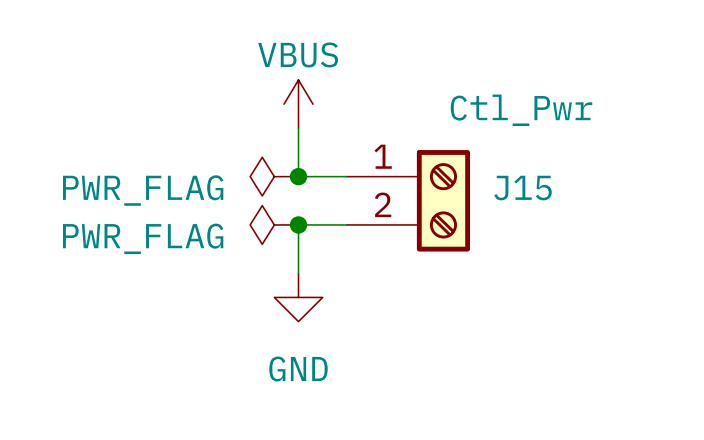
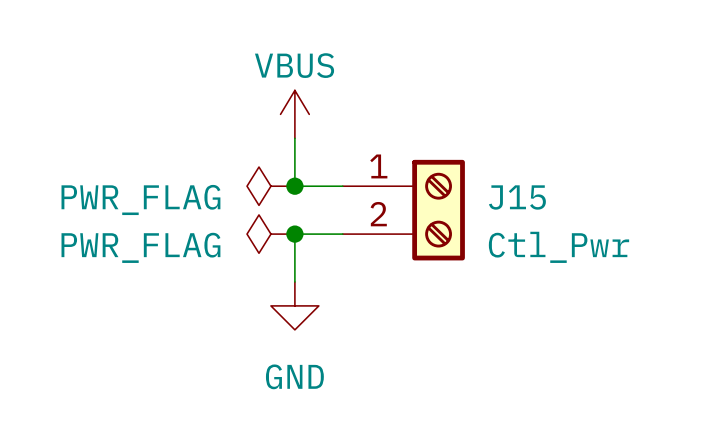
J15 value position: Ctl_Pwr (521, 110) -> Ctl_Pwr (558, 247)

